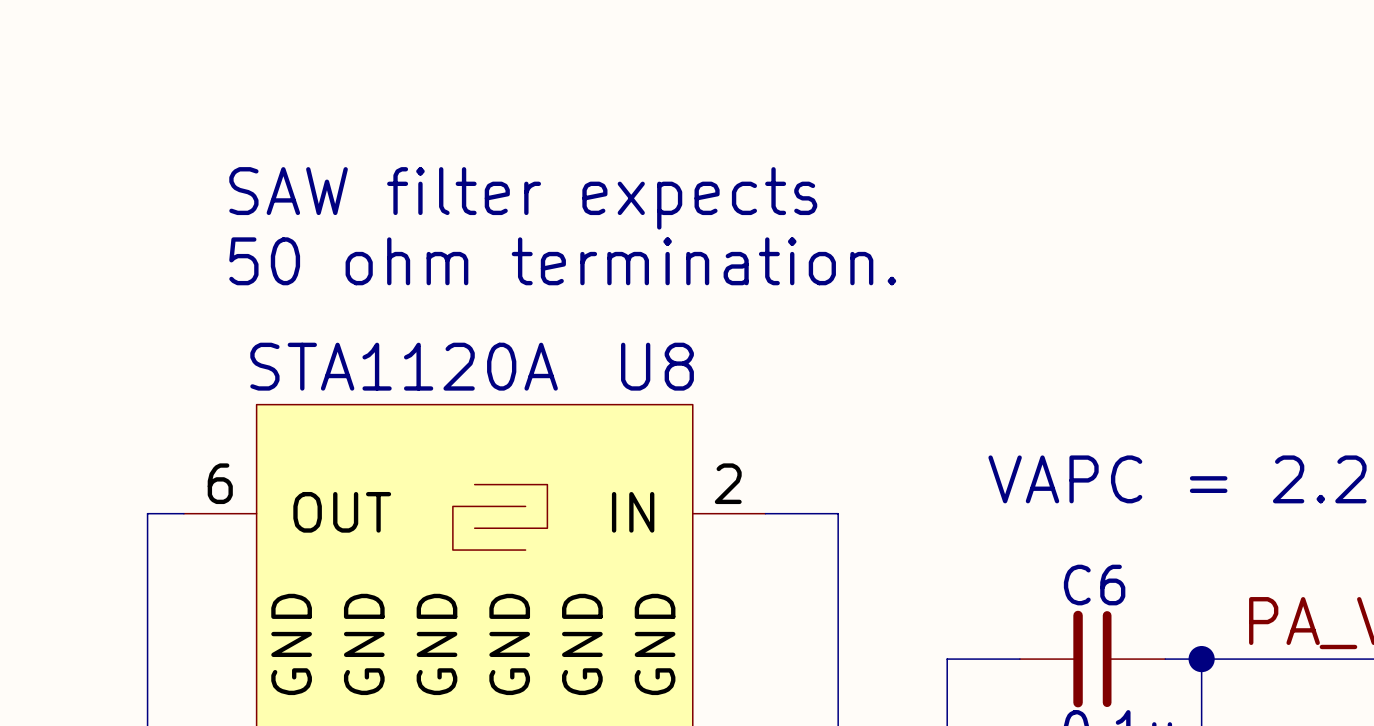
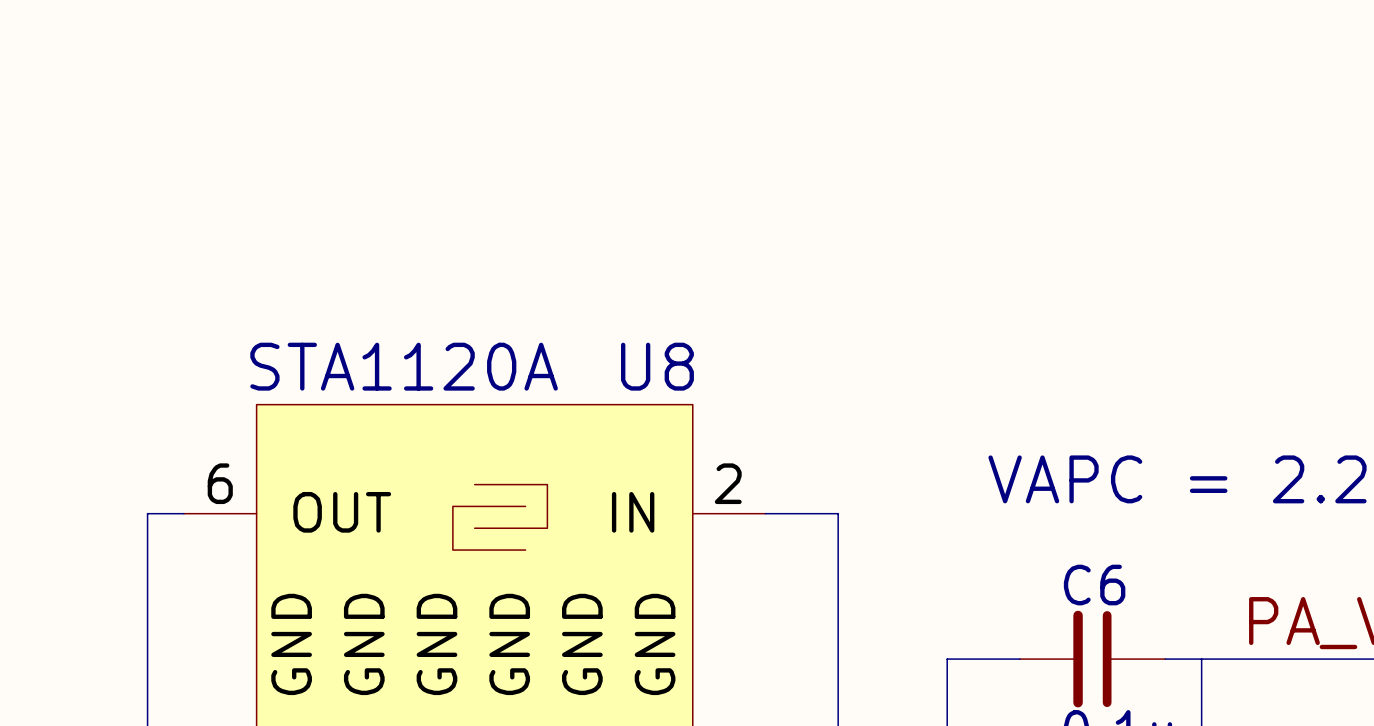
text: SAW filter expects (523, 198) -> none
text: 50 ohm termination. (562, 261) -> none
junction: (1201, 659) -> none

